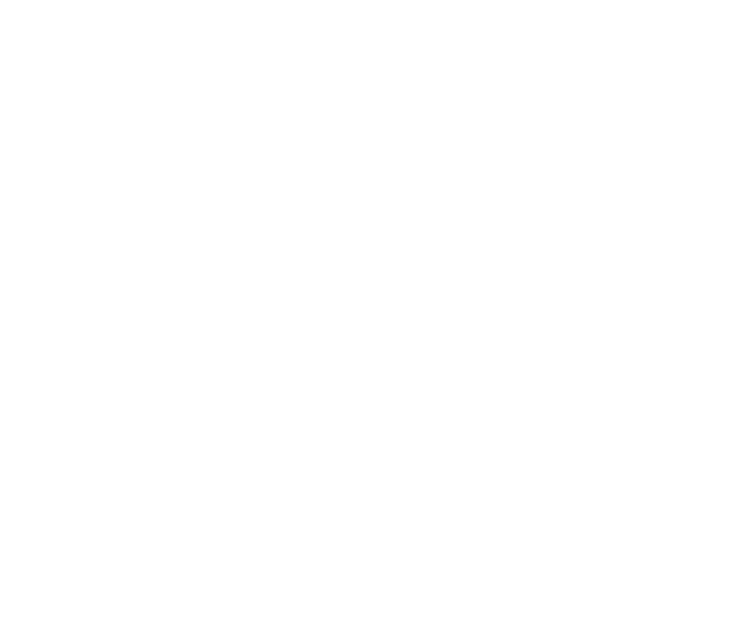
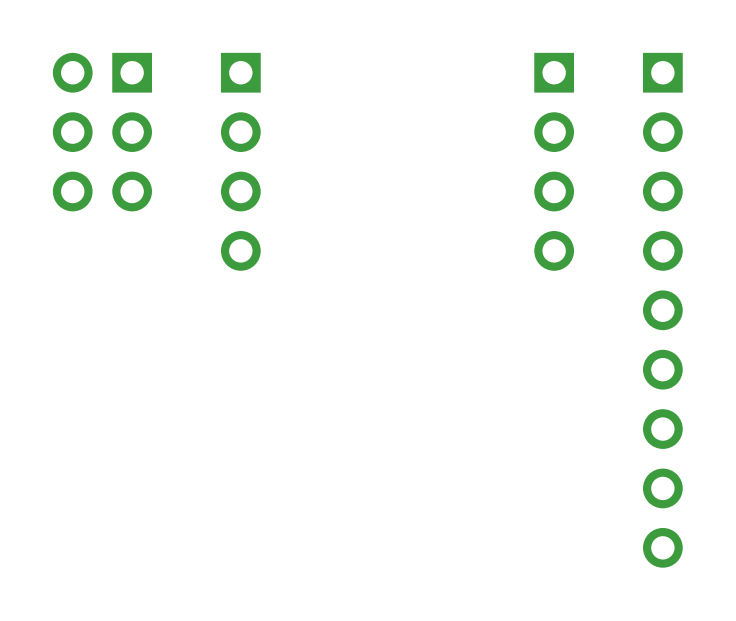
part: none -> (102, 132)
part: none -> (240, 161)
part: none -> (554, 161)
part: none -> (662, 310)

